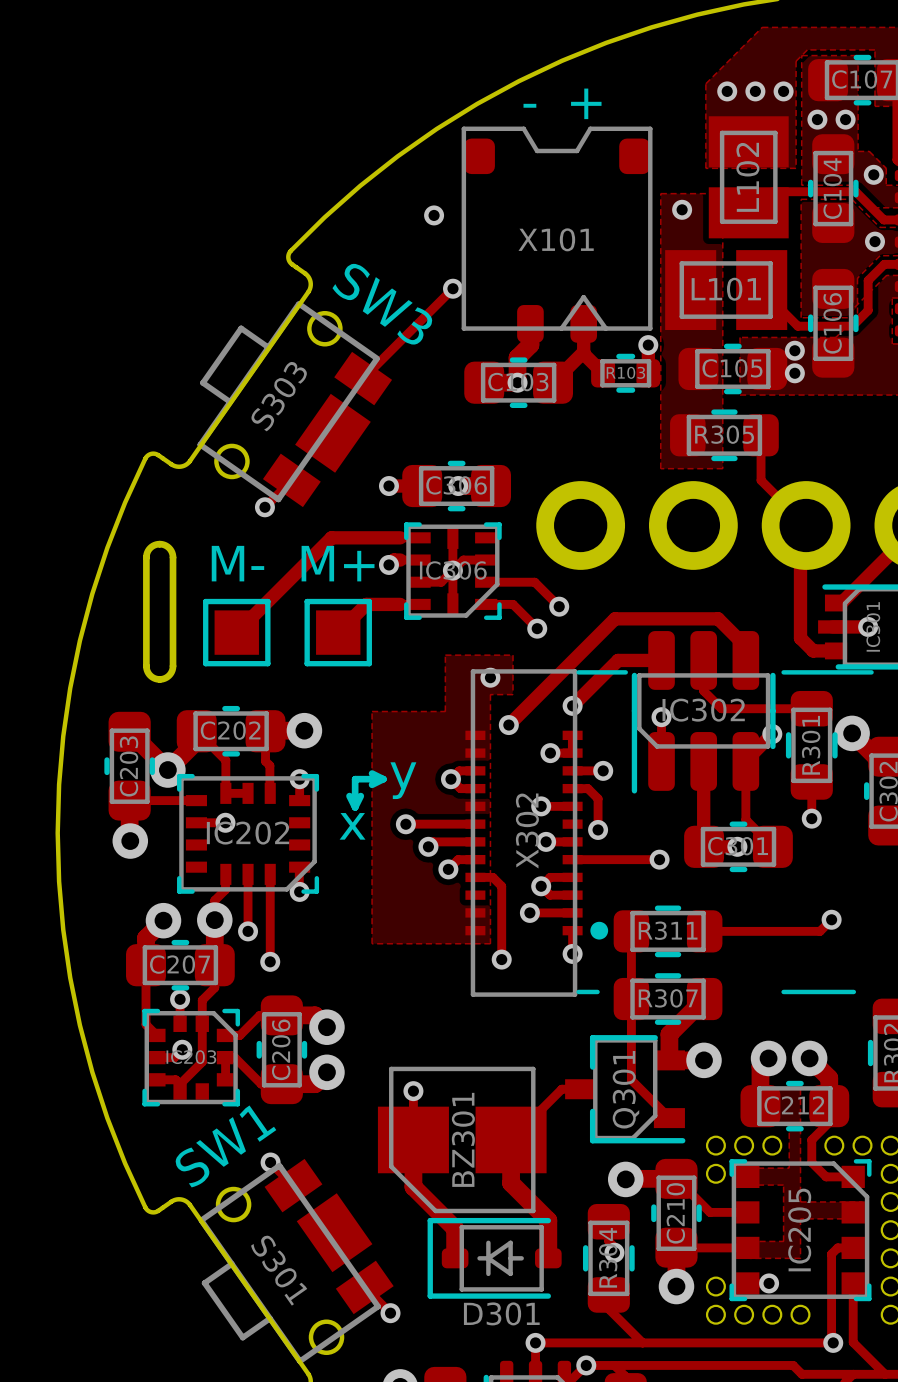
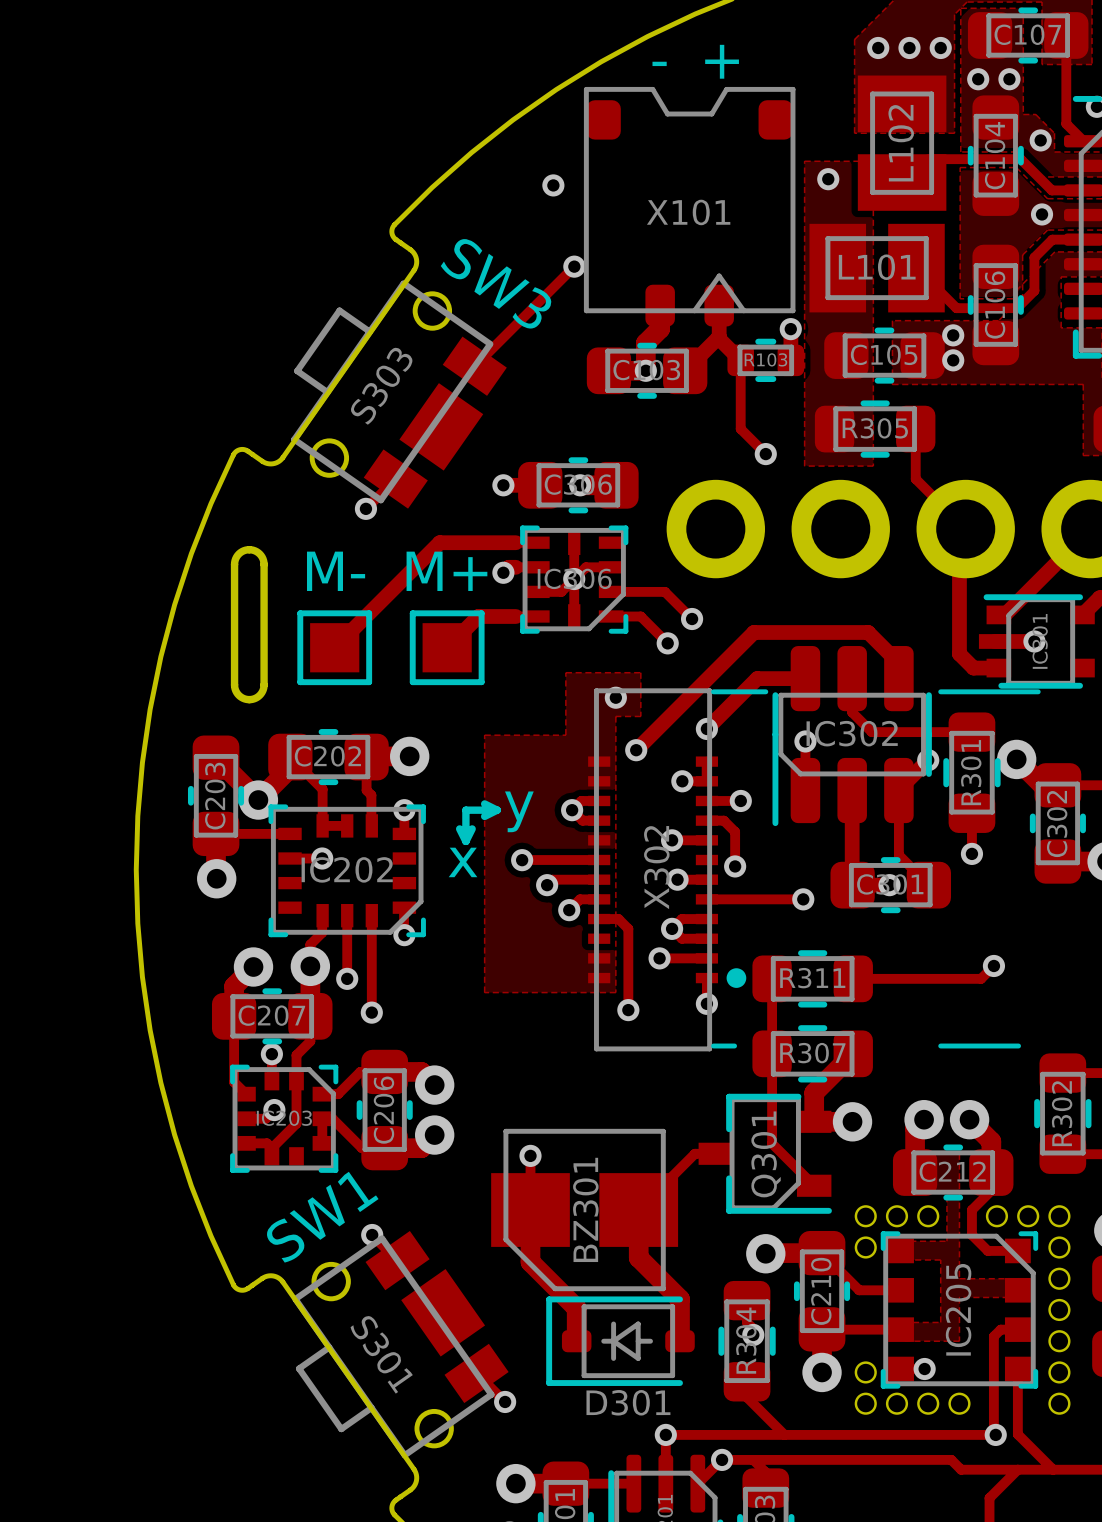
track: none -> (740, 360) (740, 428) (765, 454)
via: none -> (765, 454)

